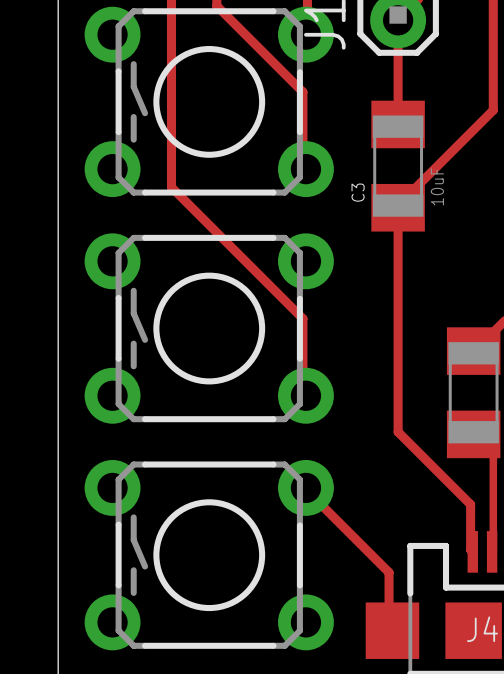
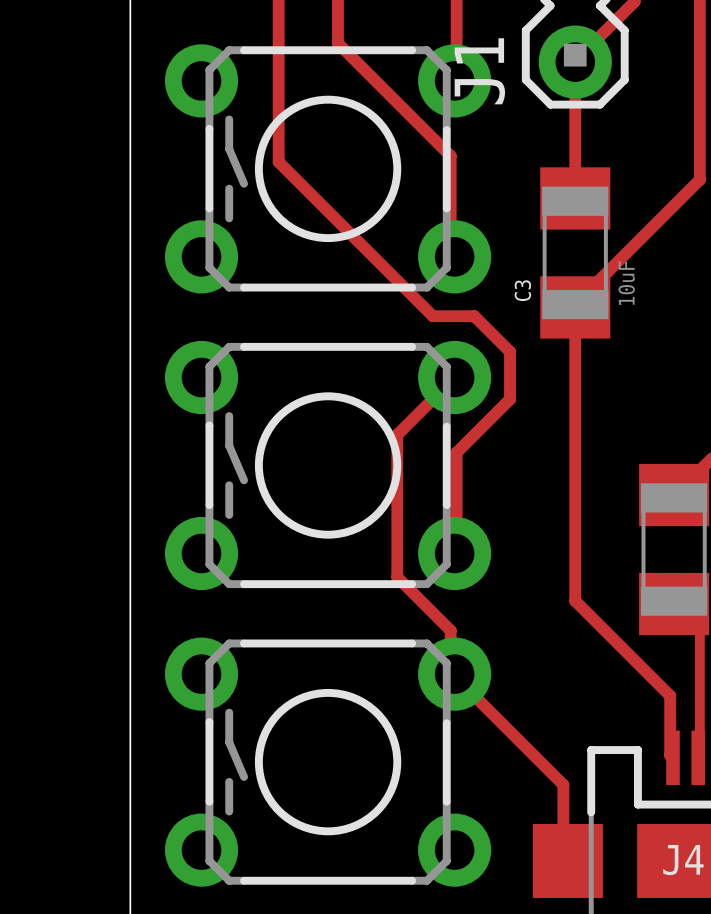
track: (171, 96) (171, 187) (302, 318) (302, 395) (305, 395) -> (278, 161) (432, 316) (474, 316) (510, 351) (510, 399) (456, 452) (456, 553) (454, 553)
track: none -> (454, 377) (397, 434) (397, 577) (450, 630) (450, 672) (454, 674)

